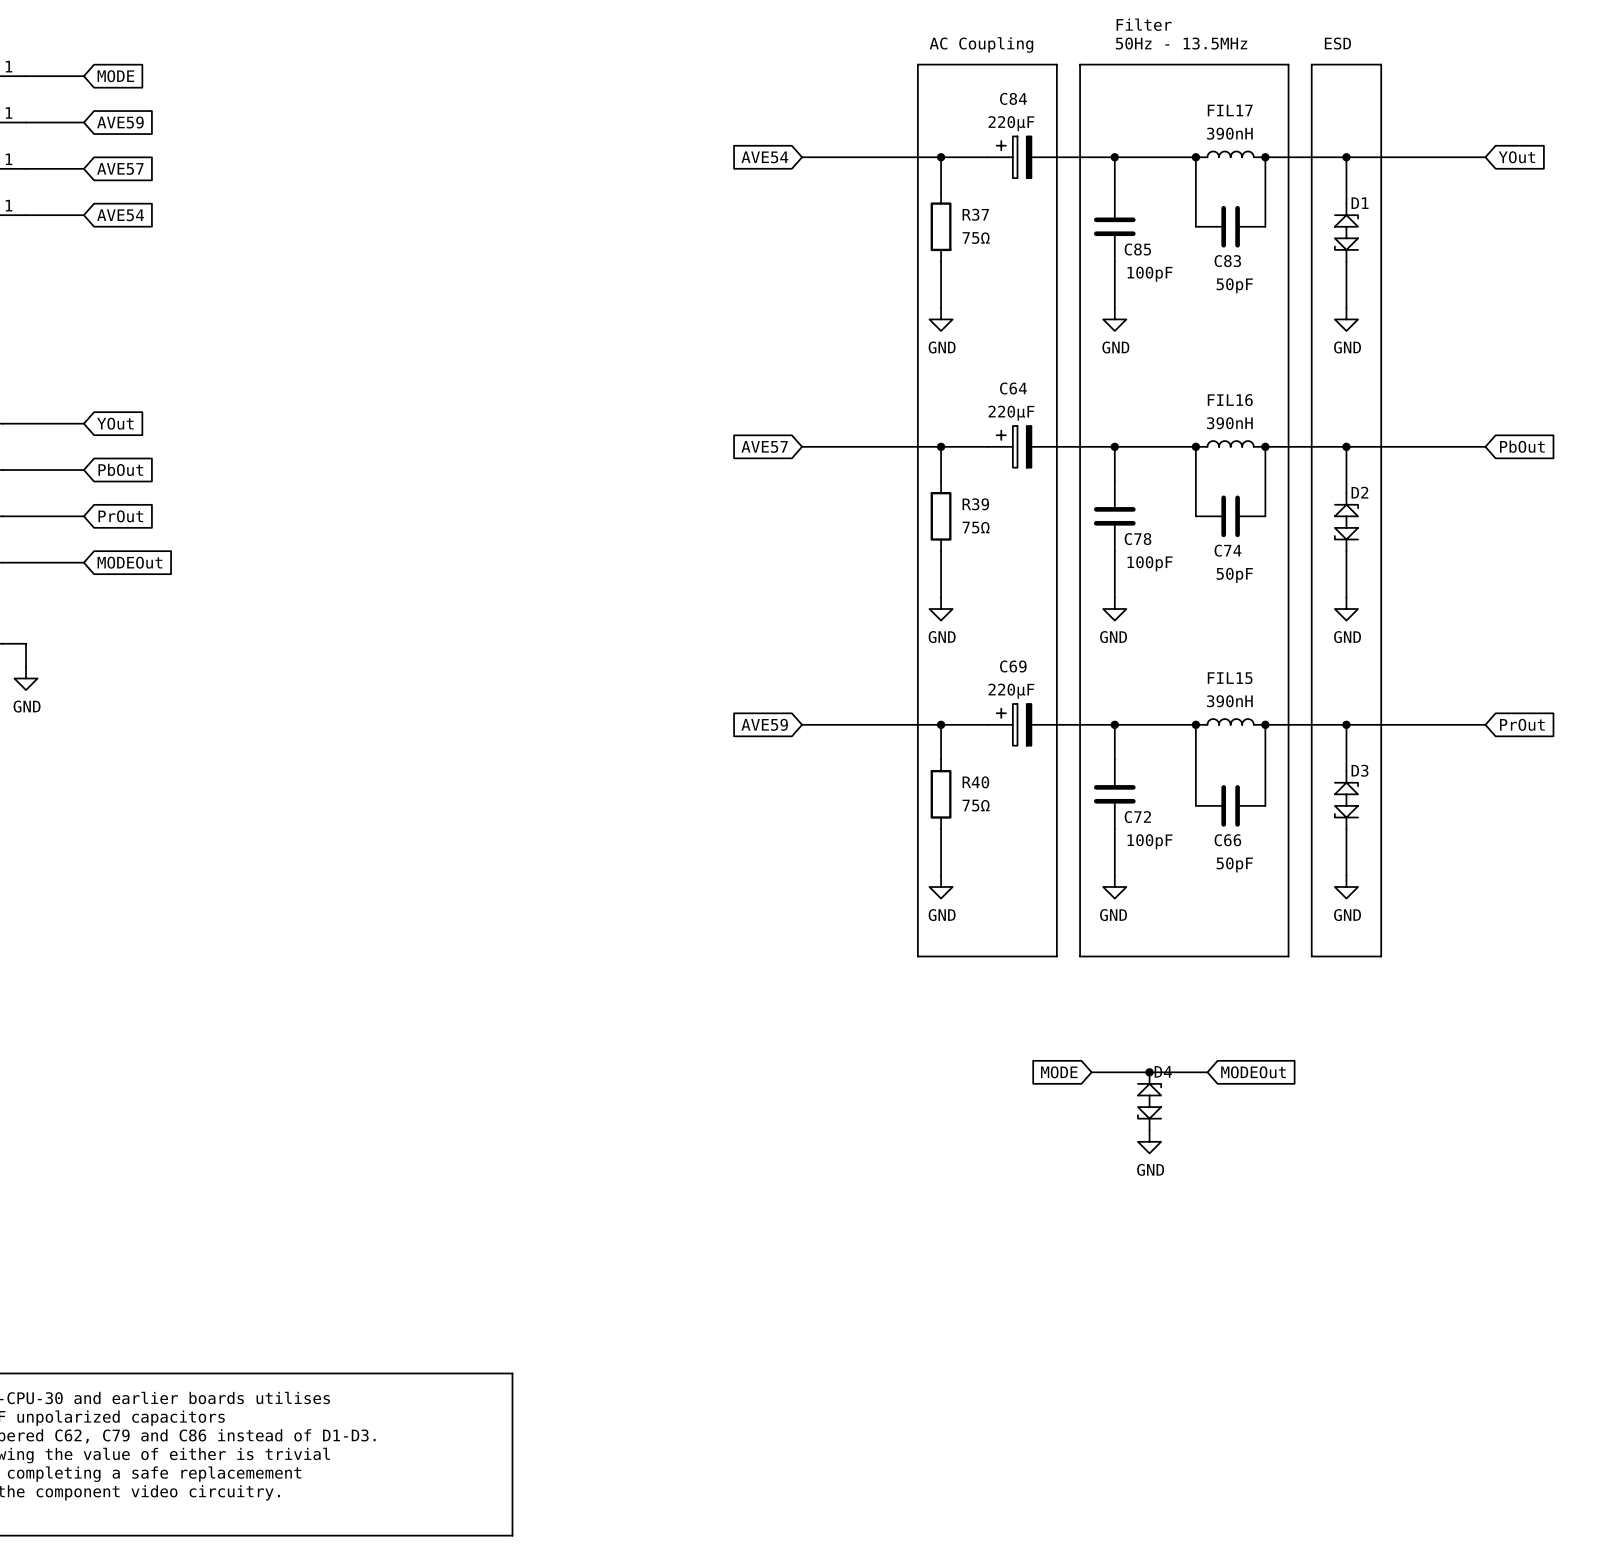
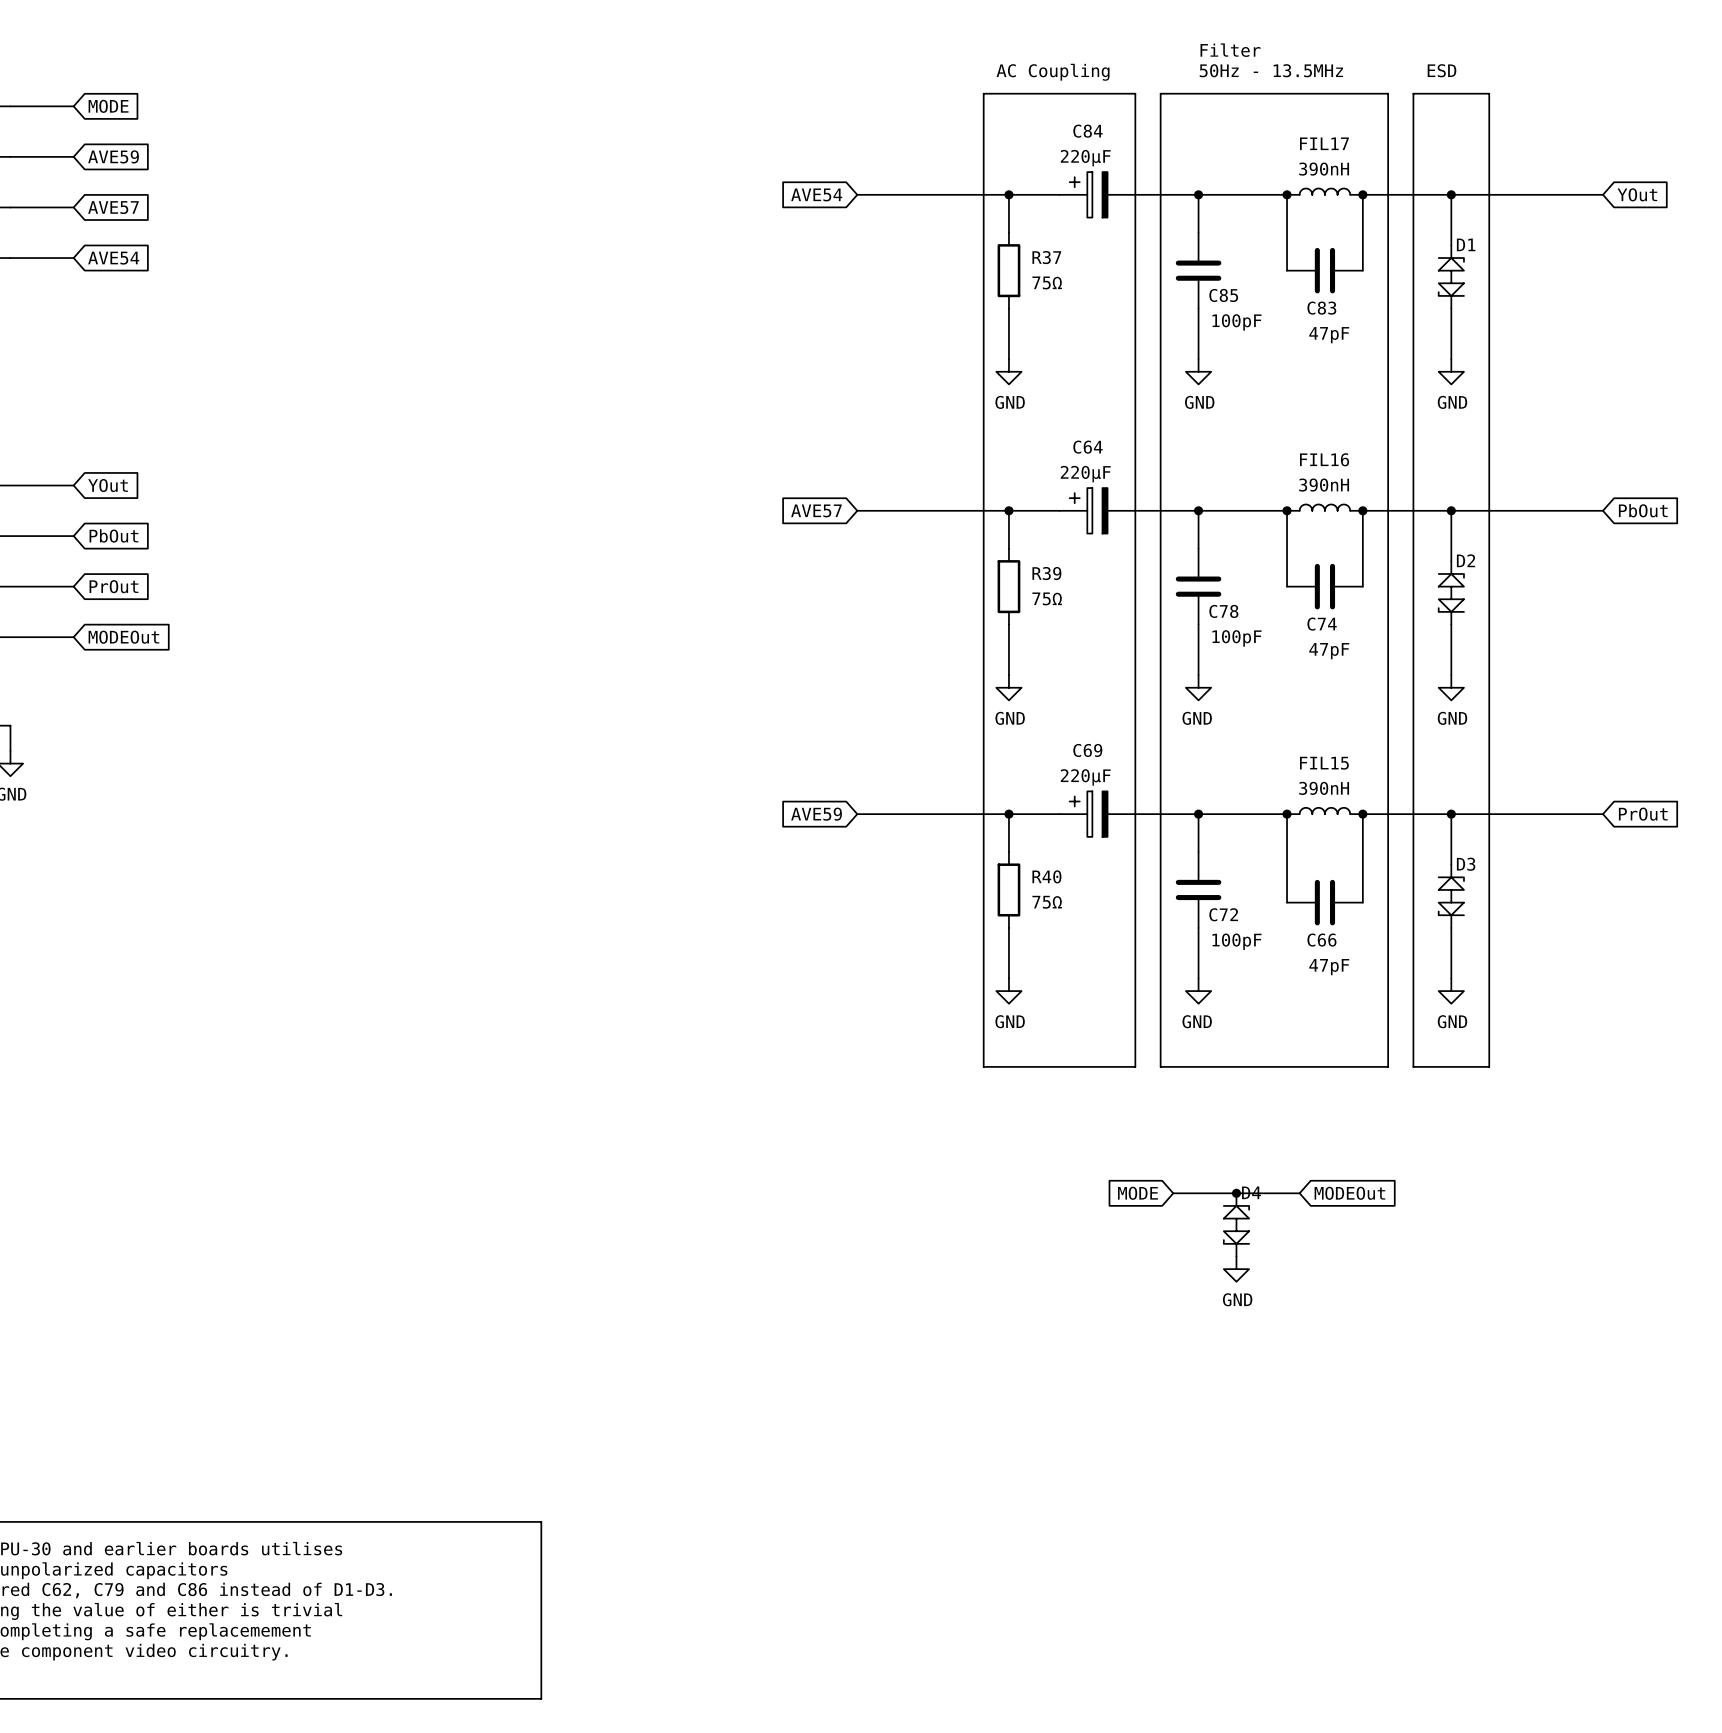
C83 value: 50pF (1234, 285) -> 47pF (1329, 335)
C74 value: 50pF (1234, 575) -> 47pF (1329, 651)
C66 value: 50pF (1234, 864) -> 47pF (1329, 967)

